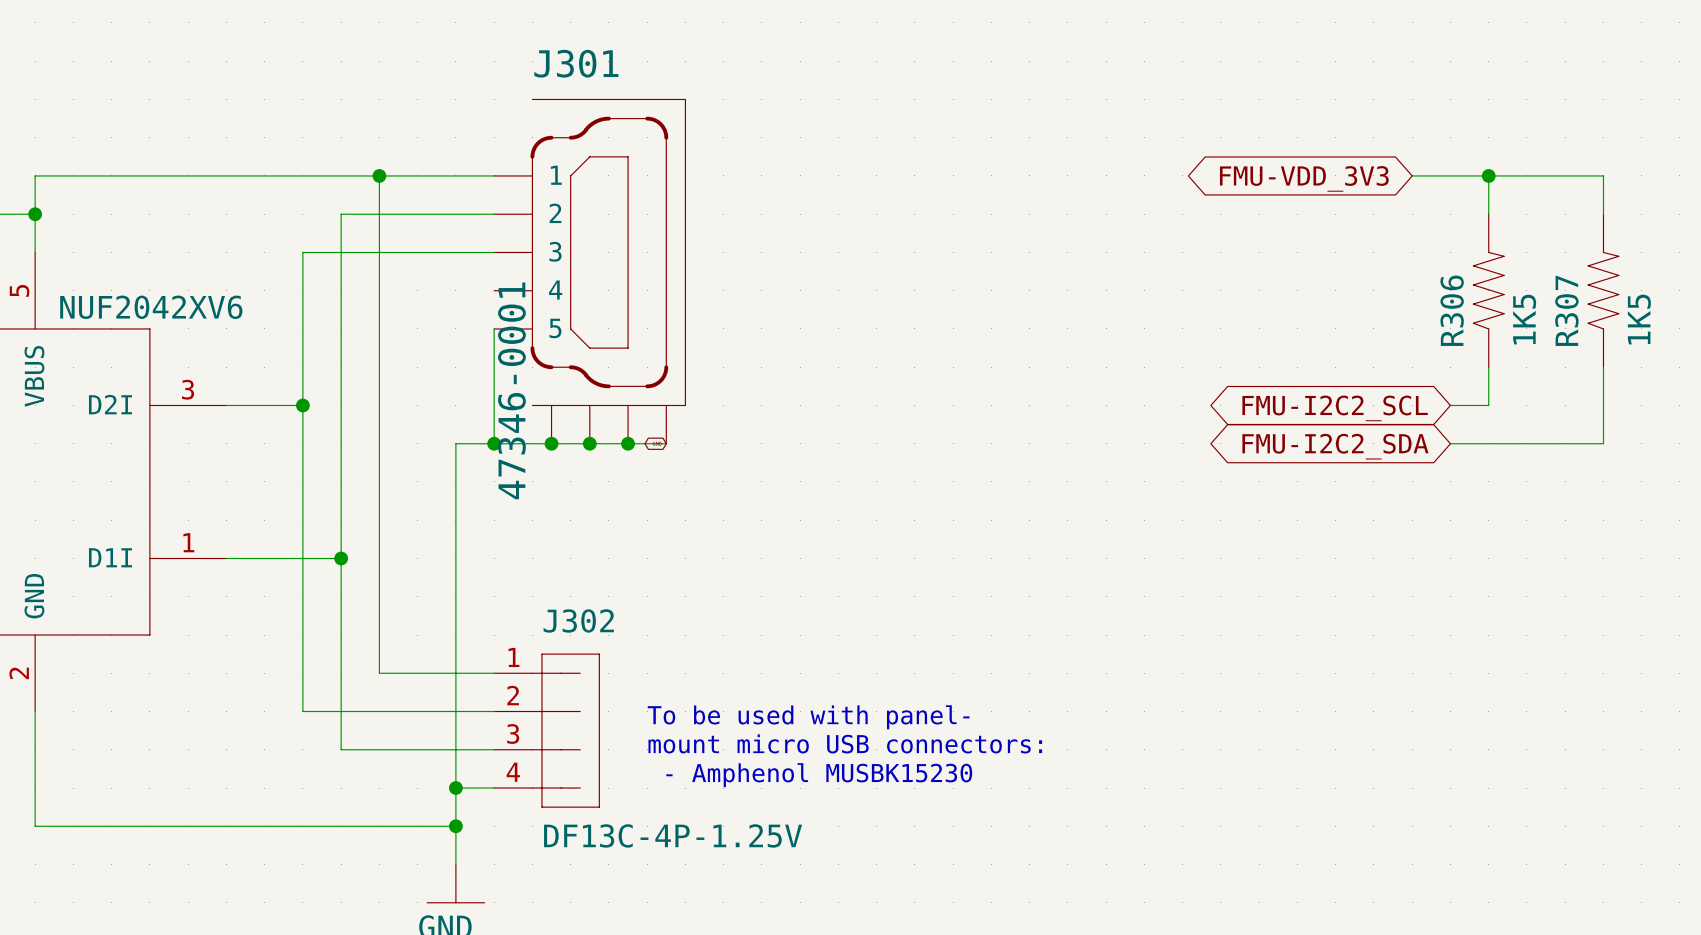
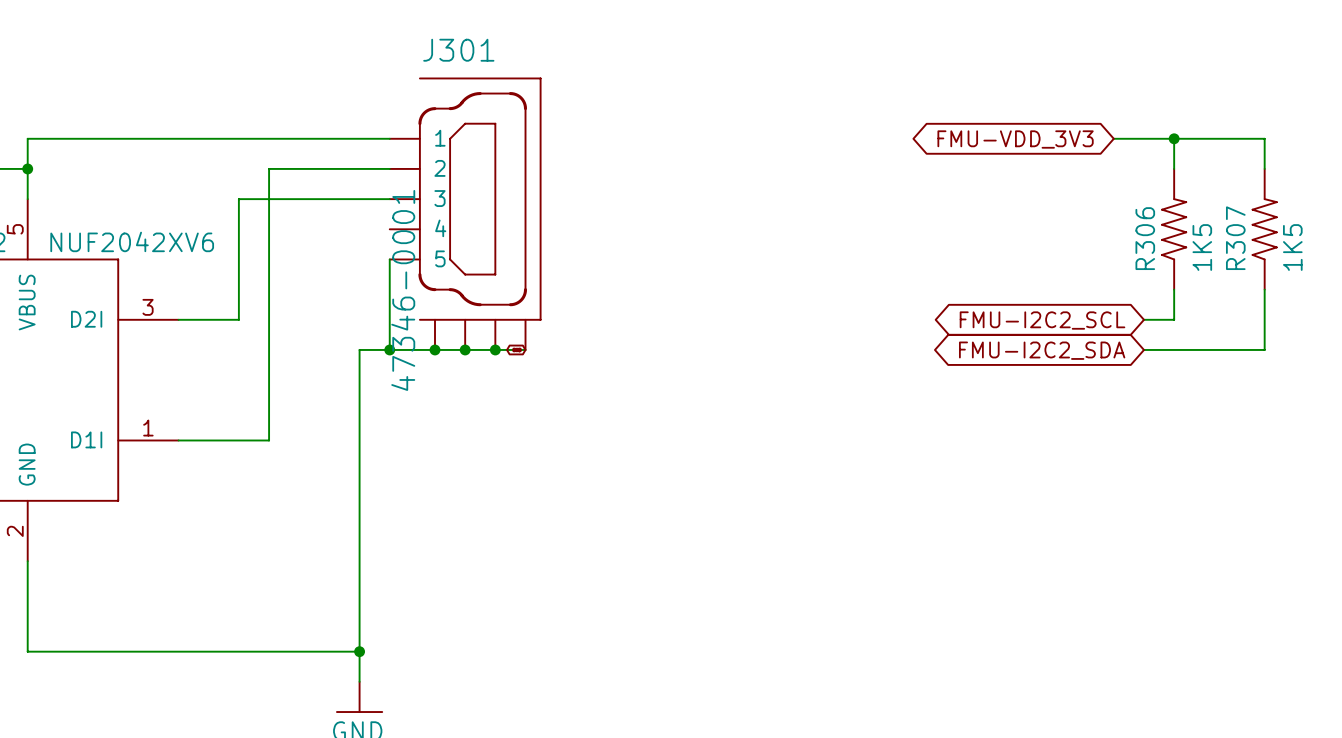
wire: (379, 175) (379, 673) (494, 673) -> none
junction: (379, 175) -> none
wire: (302, 405) (302, 711) (494, 711) -> none
junction: (302, 405) -> none
wire: (341, 558) (341, 749) (494, 749) -> none
junction: (341, 558) -> none
text: To be used with panel- (808, 717) -> none
J302: DF13C-4P-1.25V (546, 730) -> none
text: mount micro USB connectors: (845, 743) -> none
text: - Amphenol MUSBK15230 (819, 775) -> none
wire: (455, 788) (494, 788) -> none
junction: (455, 788) -> none

